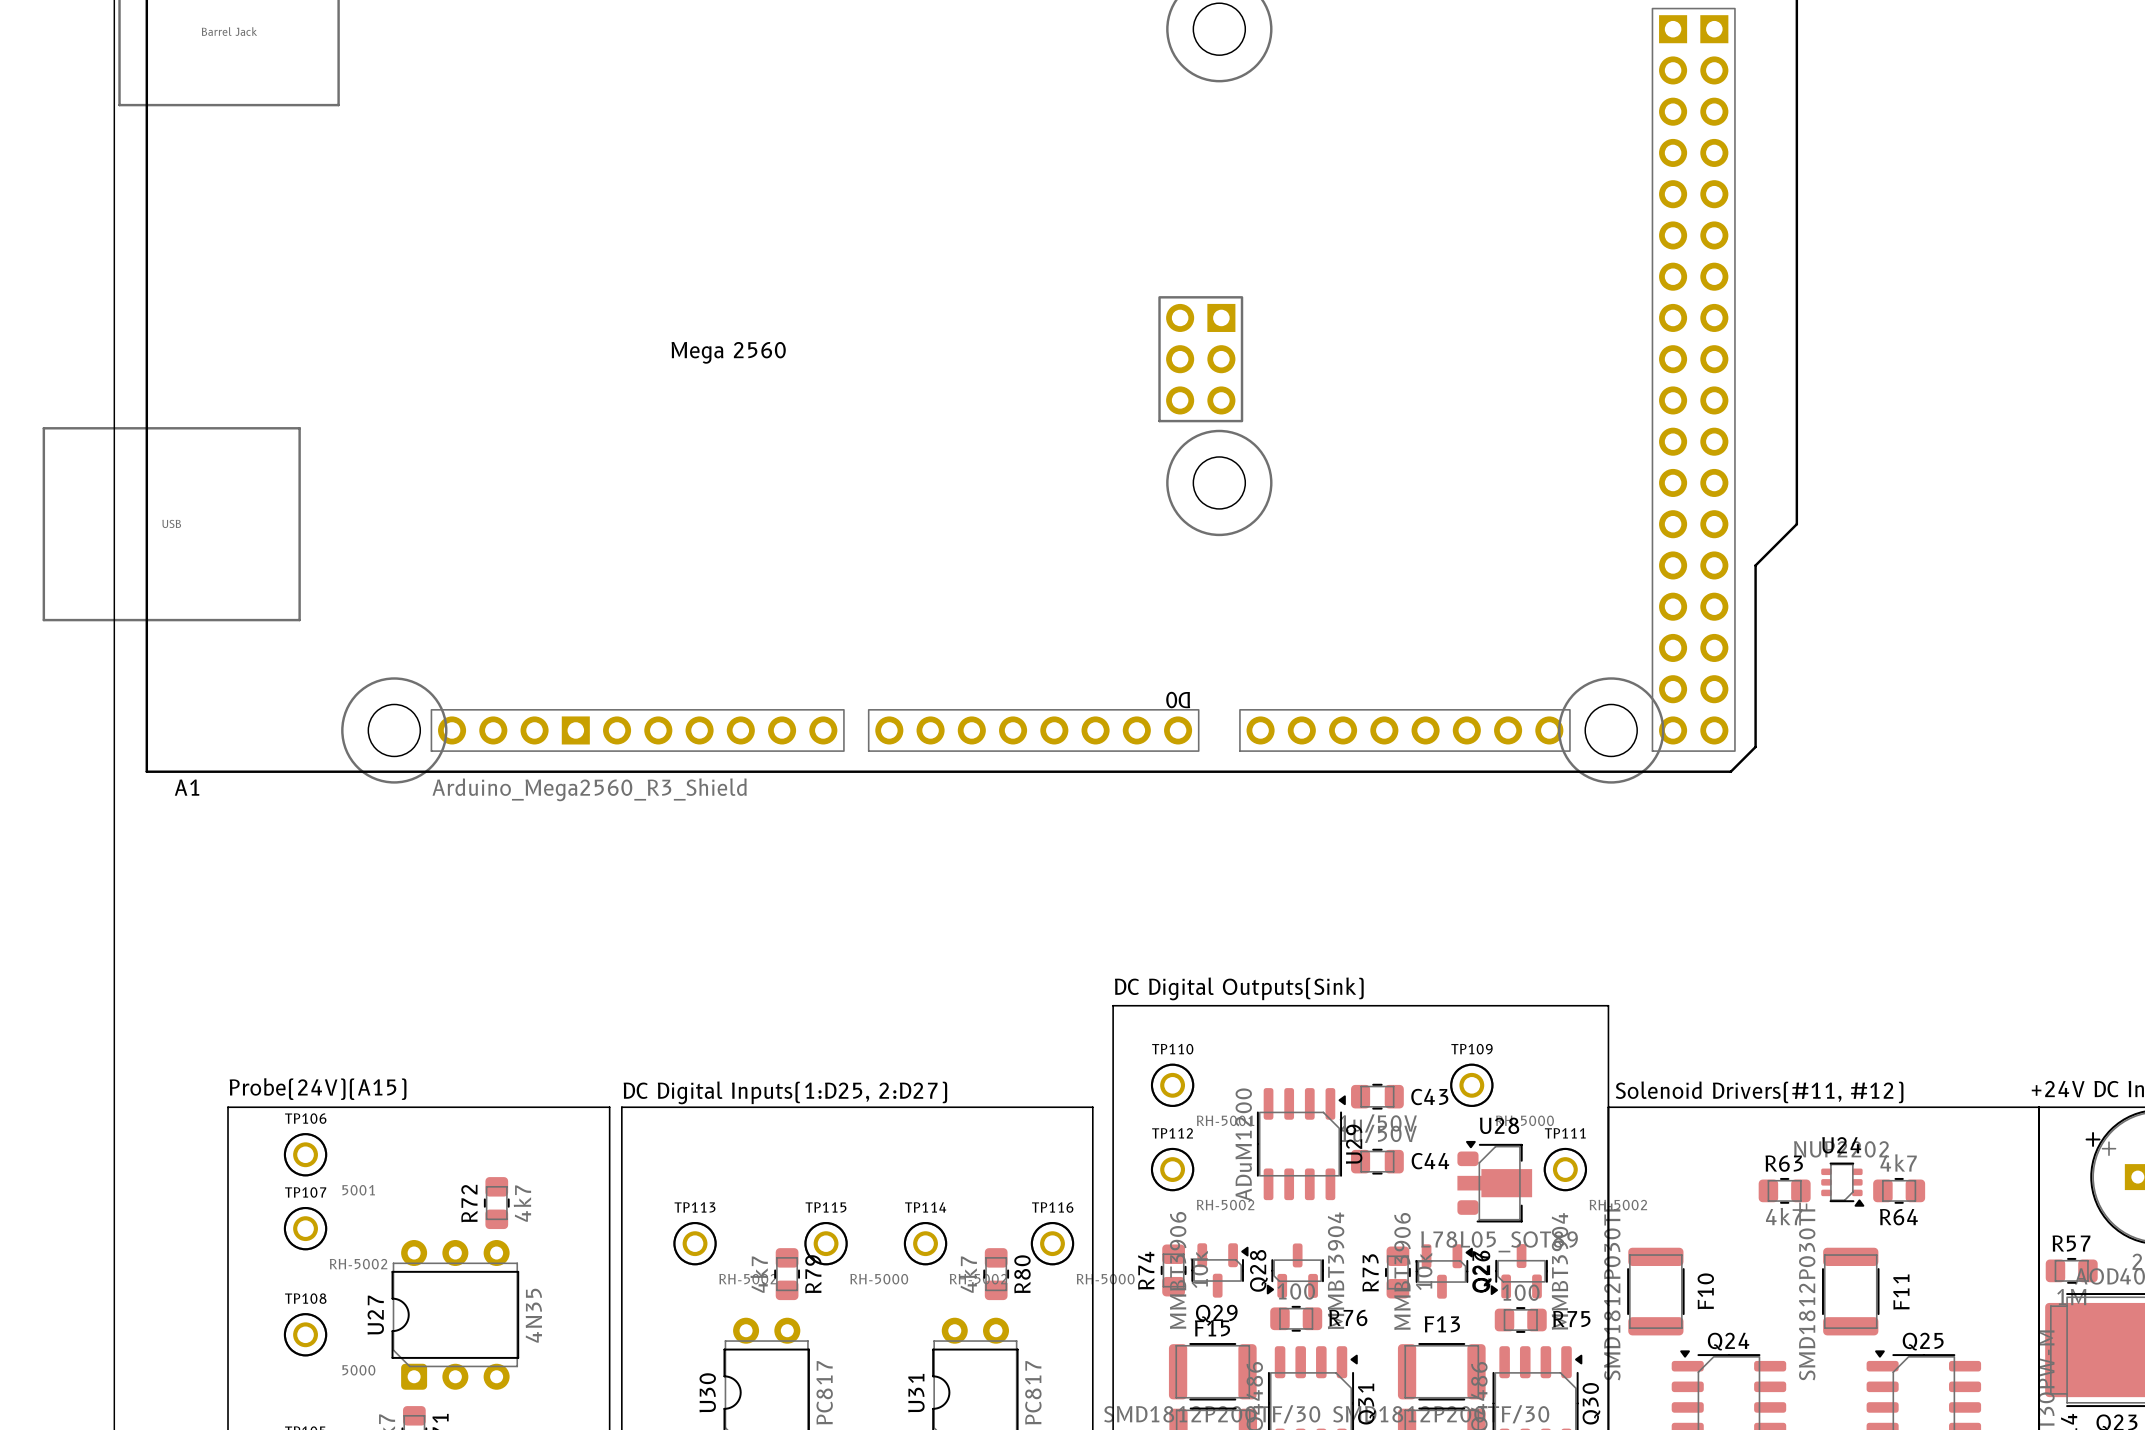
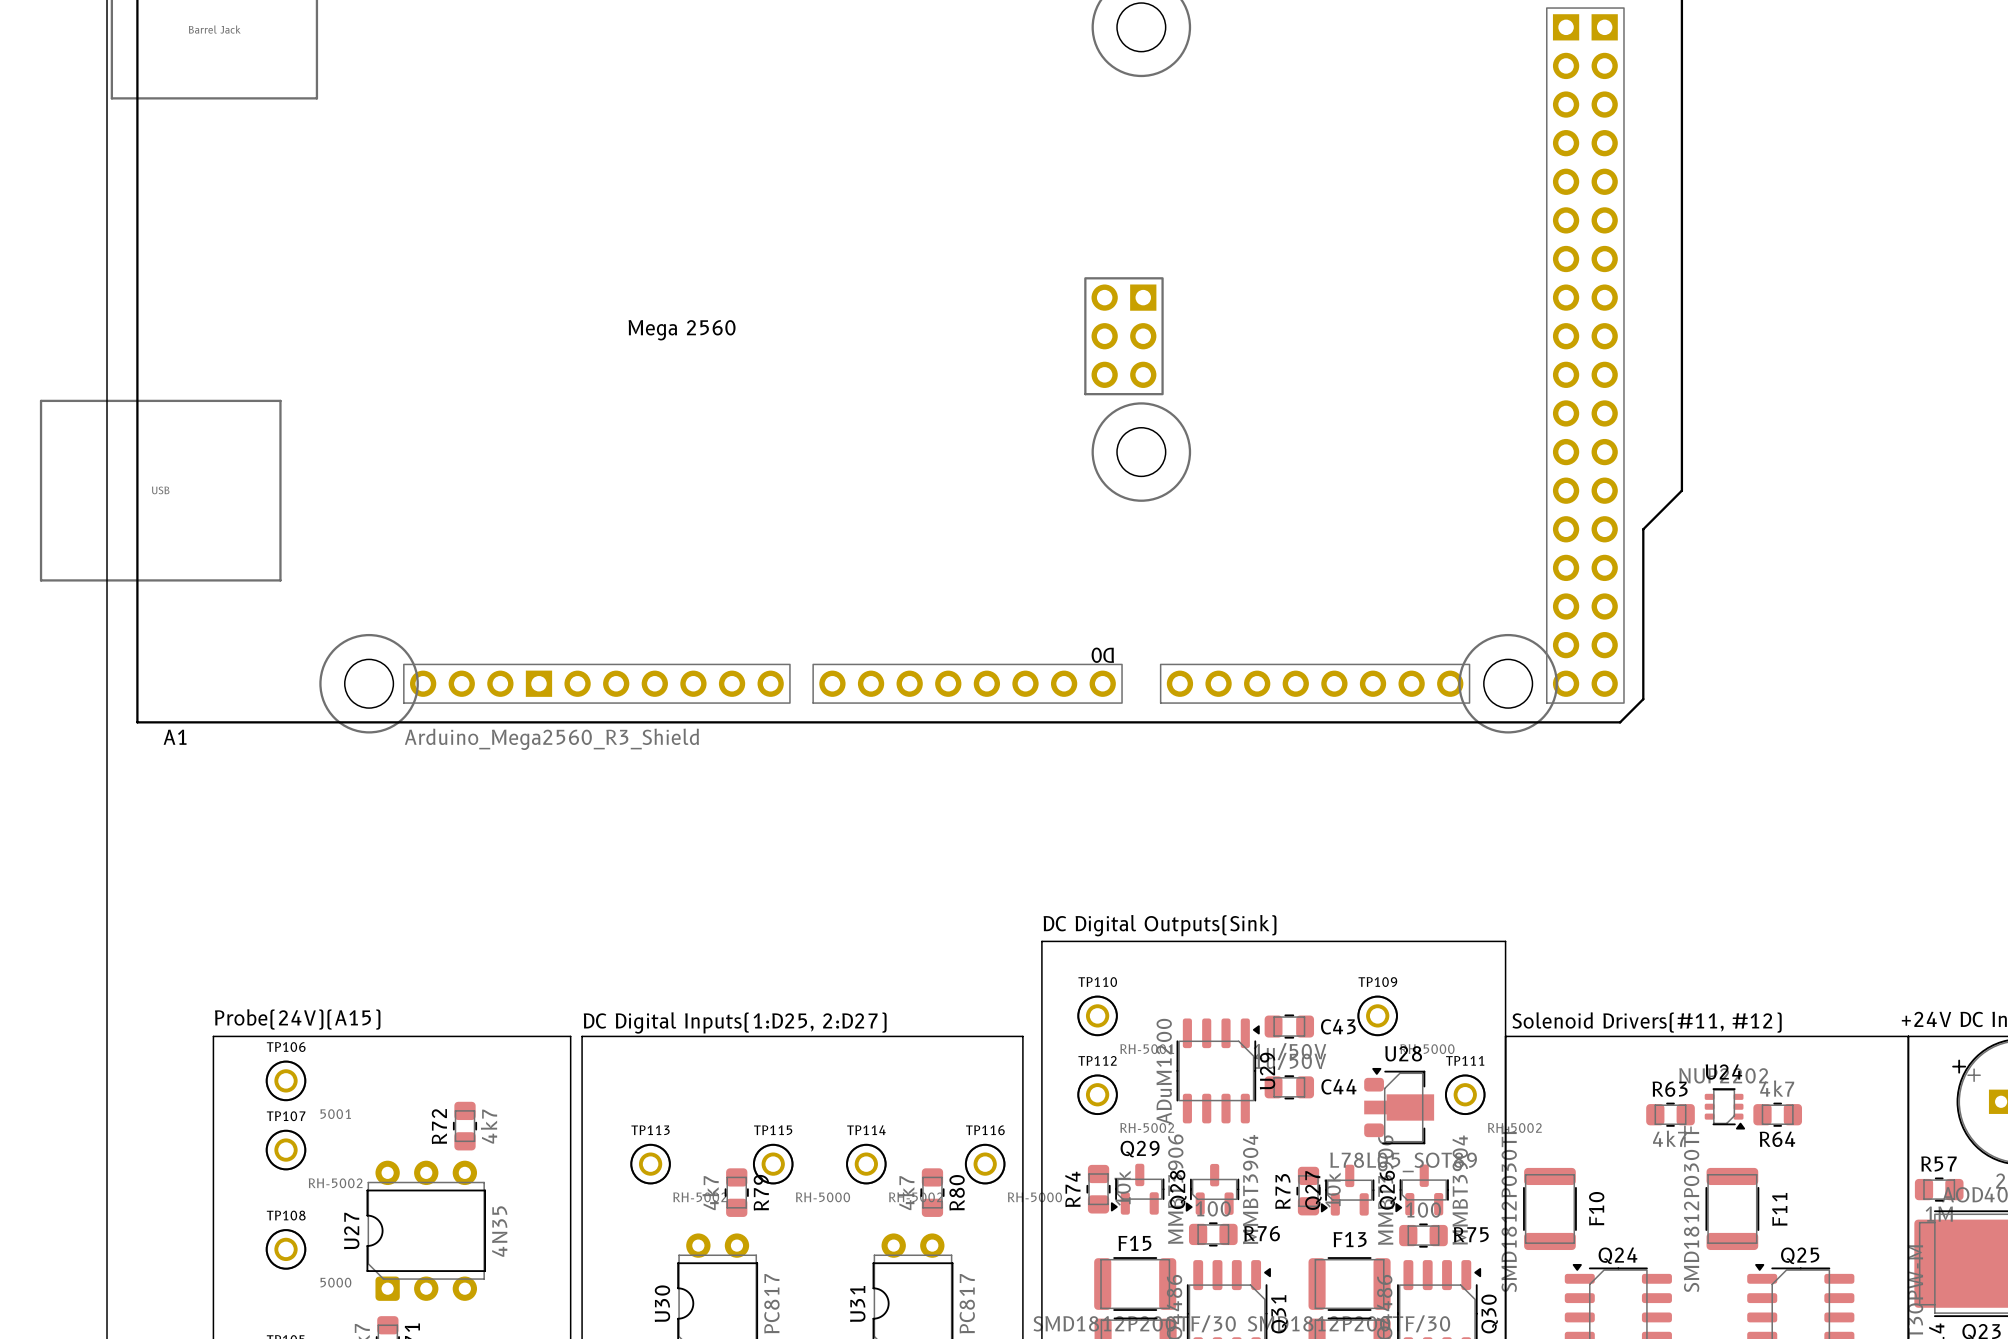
Q29 rotation: 0° (1219, 1270) -> 180° (1137, 1189)
Q27 rotation: 0° (1444, 1271) -> 180° (1347, 1190)

